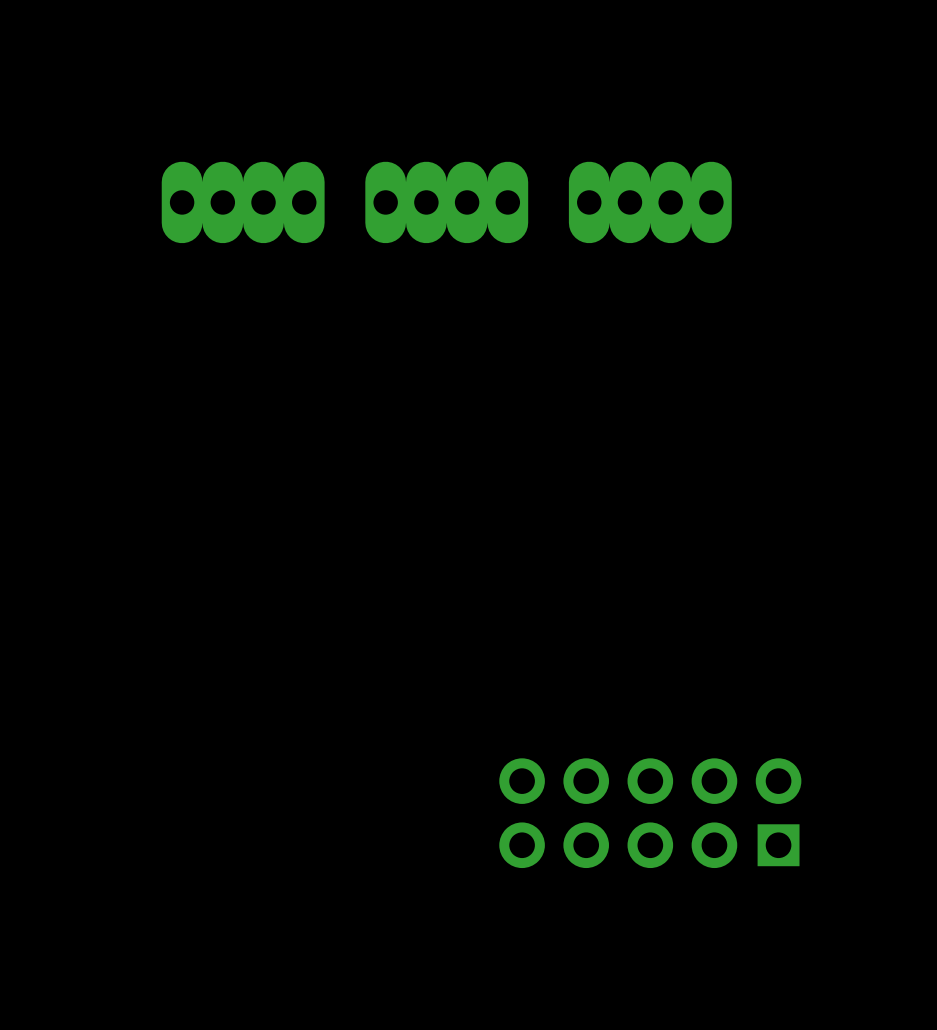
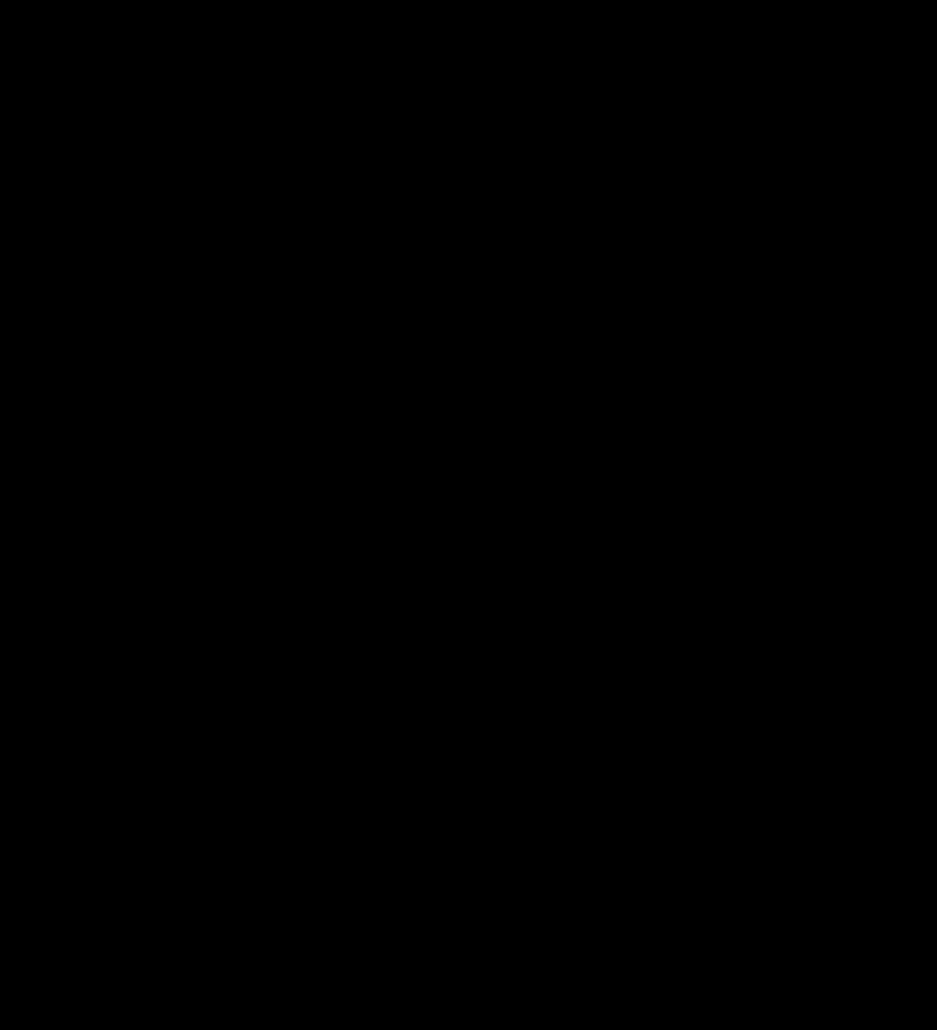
part: (243, 202) -> none
part: (446, 202) -> none
part: (650, 202) -> none
part: (650, 813) -> none

